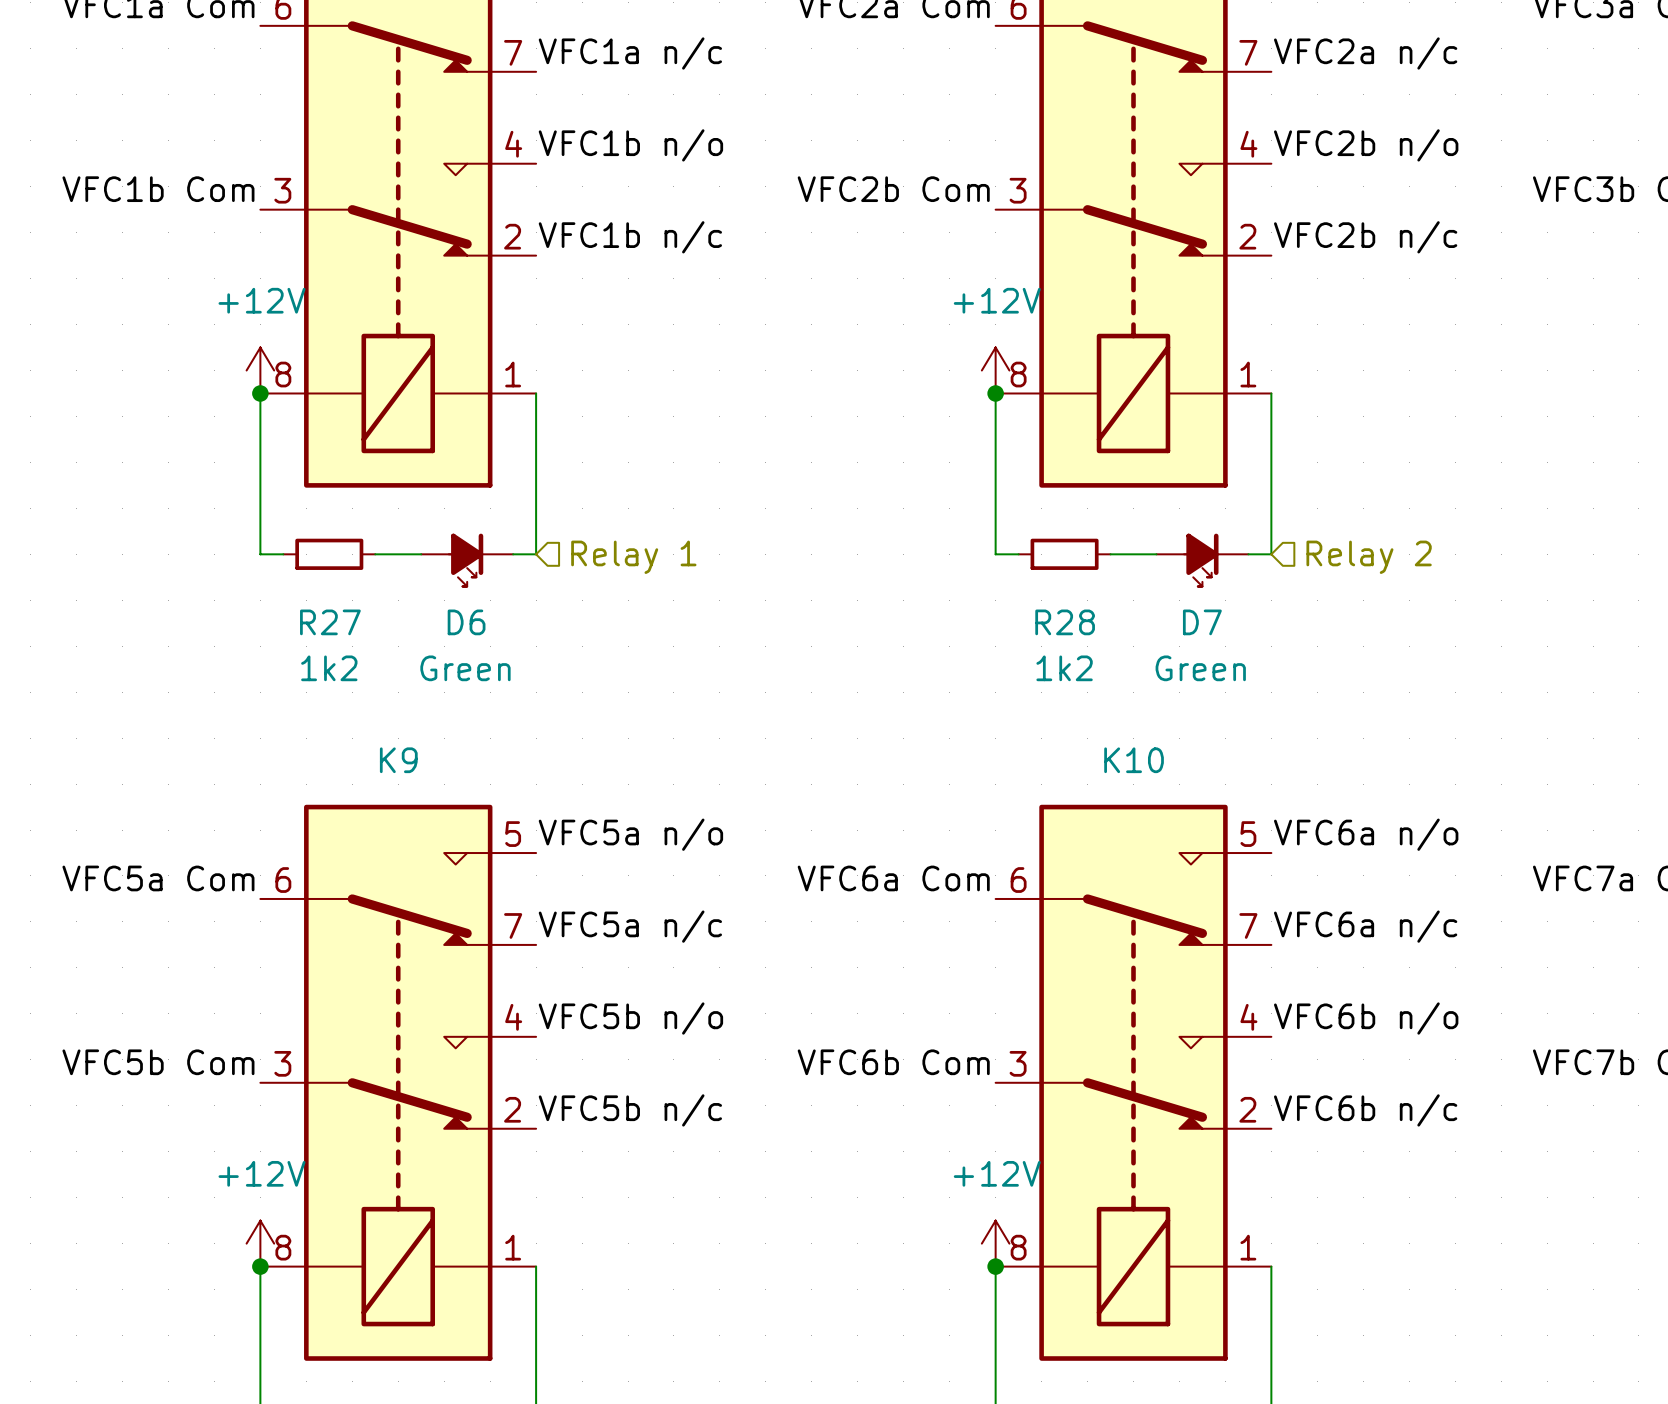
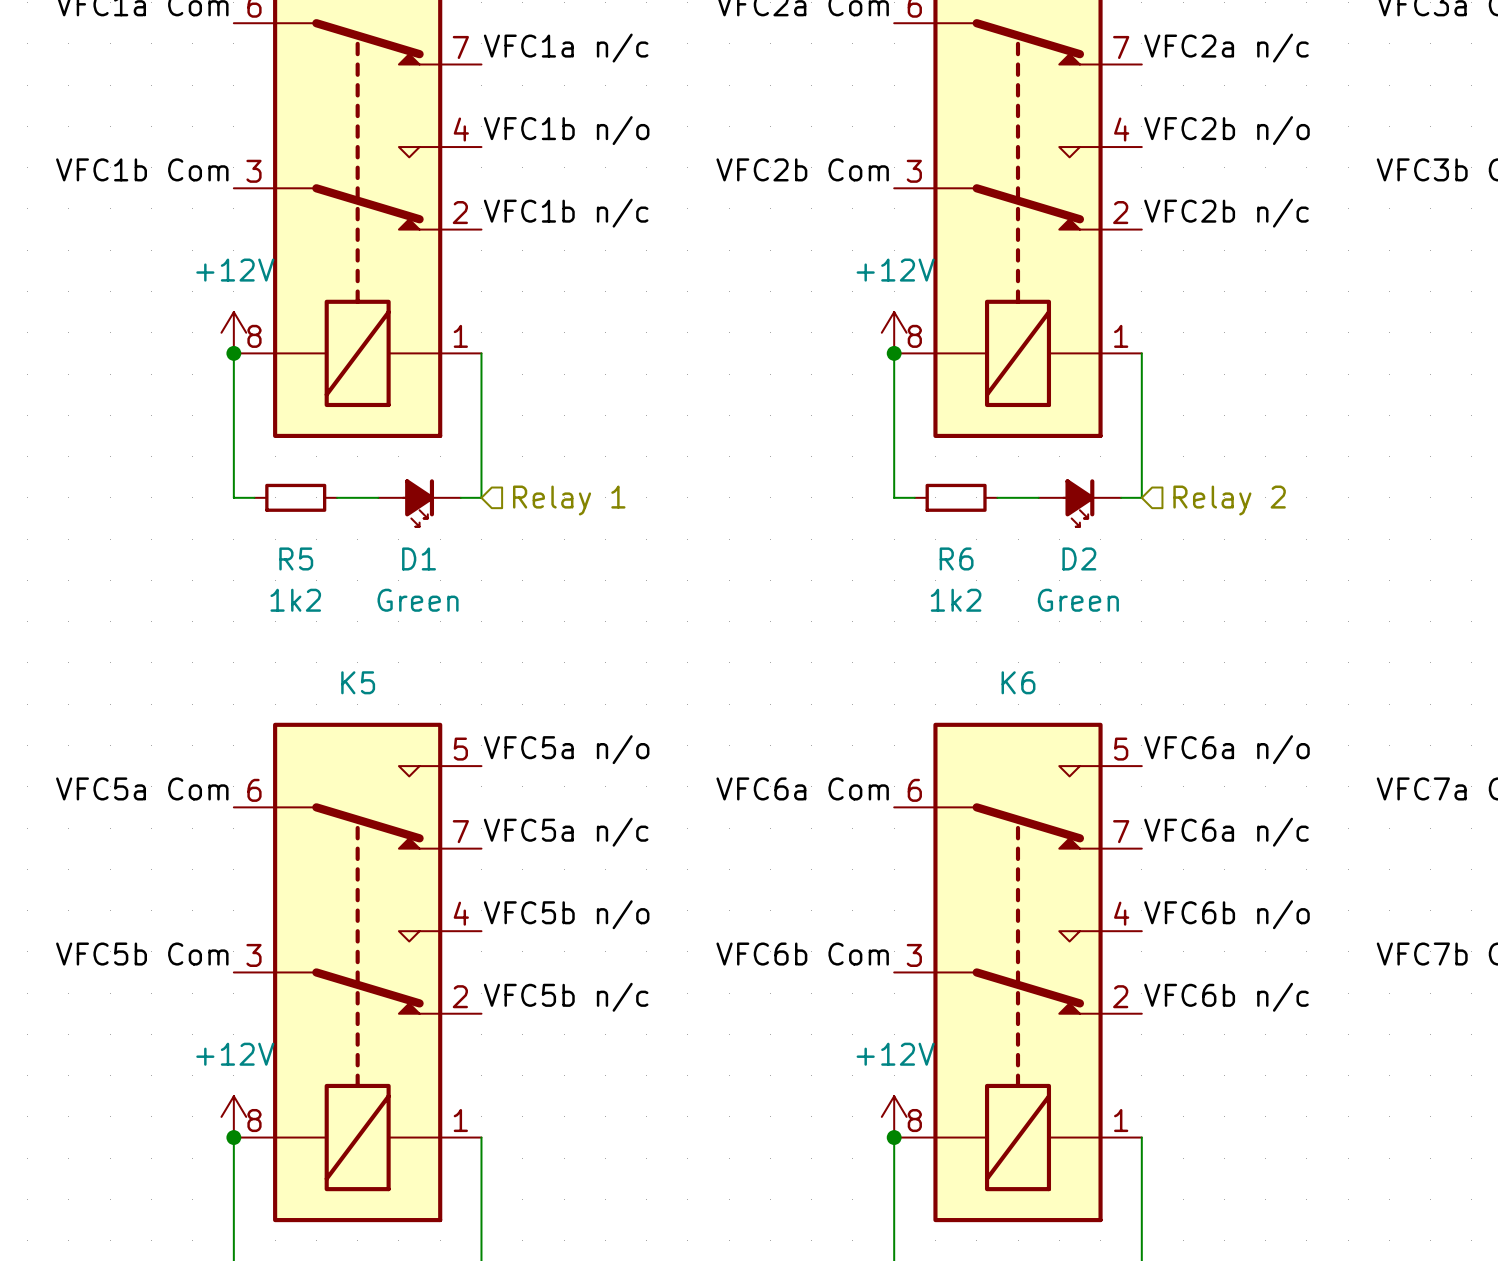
R27 name: R27 (330, 622) -> R5 (296, 558)
D6 name: D6 (466, 622) -> D1 (419, 558)
R28 name: R28 (1065, 622) -> R6 (956, 558)
D7 name: D7 (1202, 622) -> D2 (1079, 558)
K9 name: K9 (398, 760) -> K5 (358, 682)
K10 name: K10 (1134, 760) -> K6 (1018, 682)

